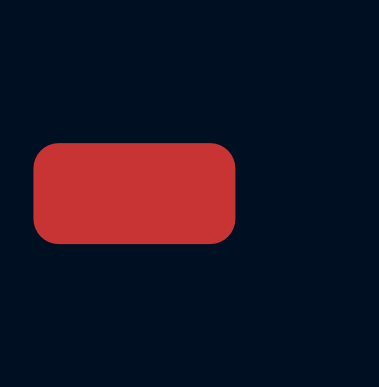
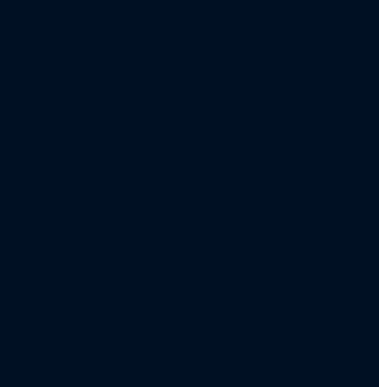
part: (134, 193) -> none

